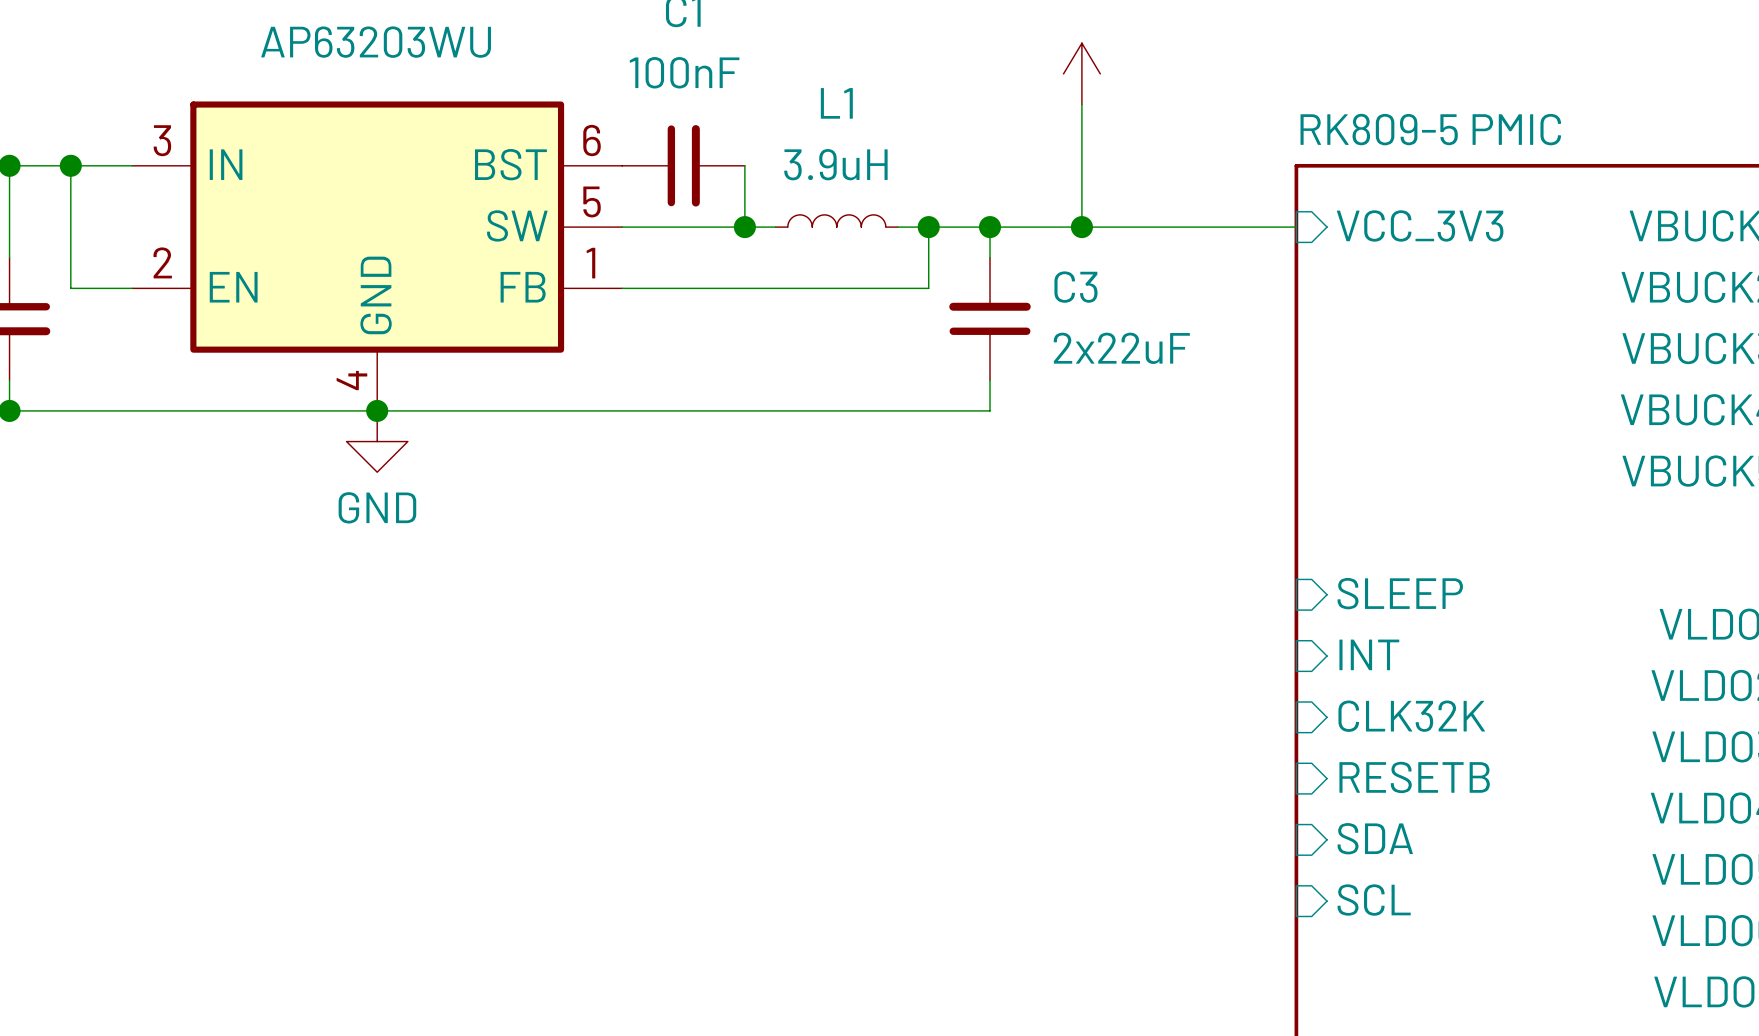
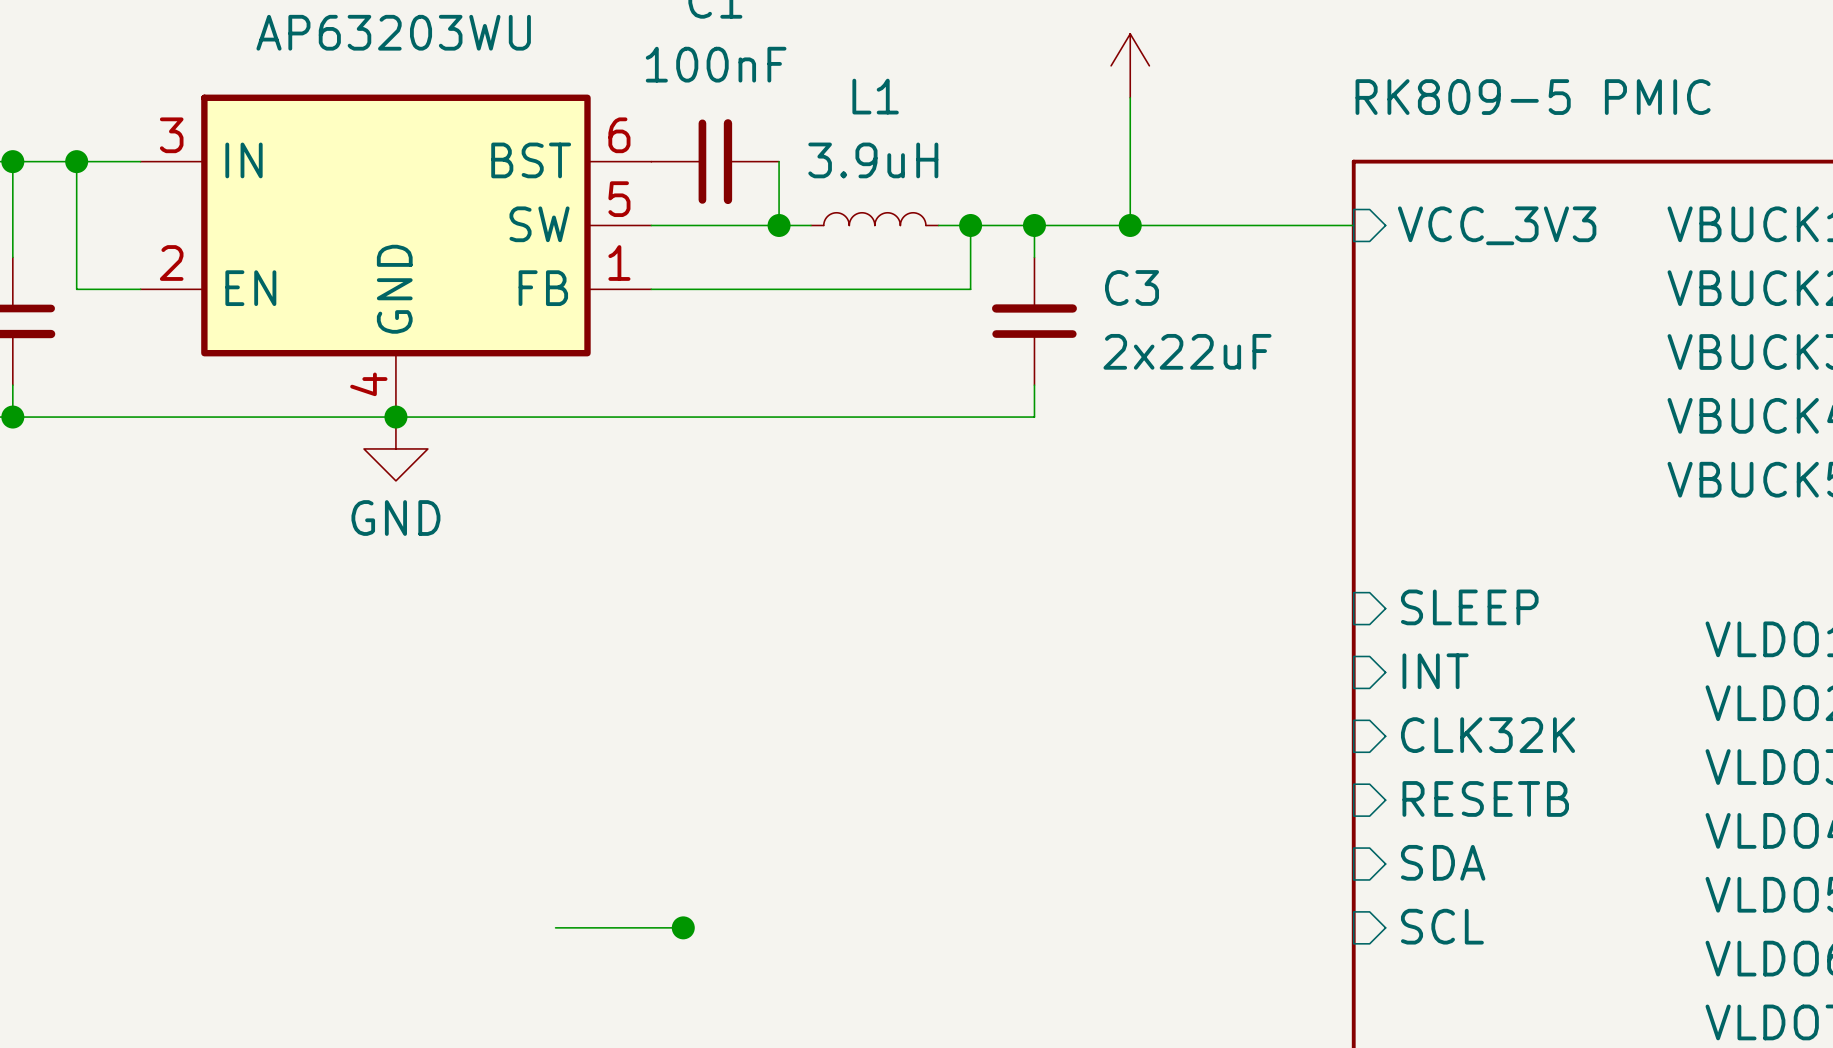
sheet RK809-5 PMIC name position: RK809-5 PMIC (1430, 129) -> RK809-5 PMIC (1533, 97)
wire: none -> (555, 927) (683, 927)
junction: none -> (683, 927)

